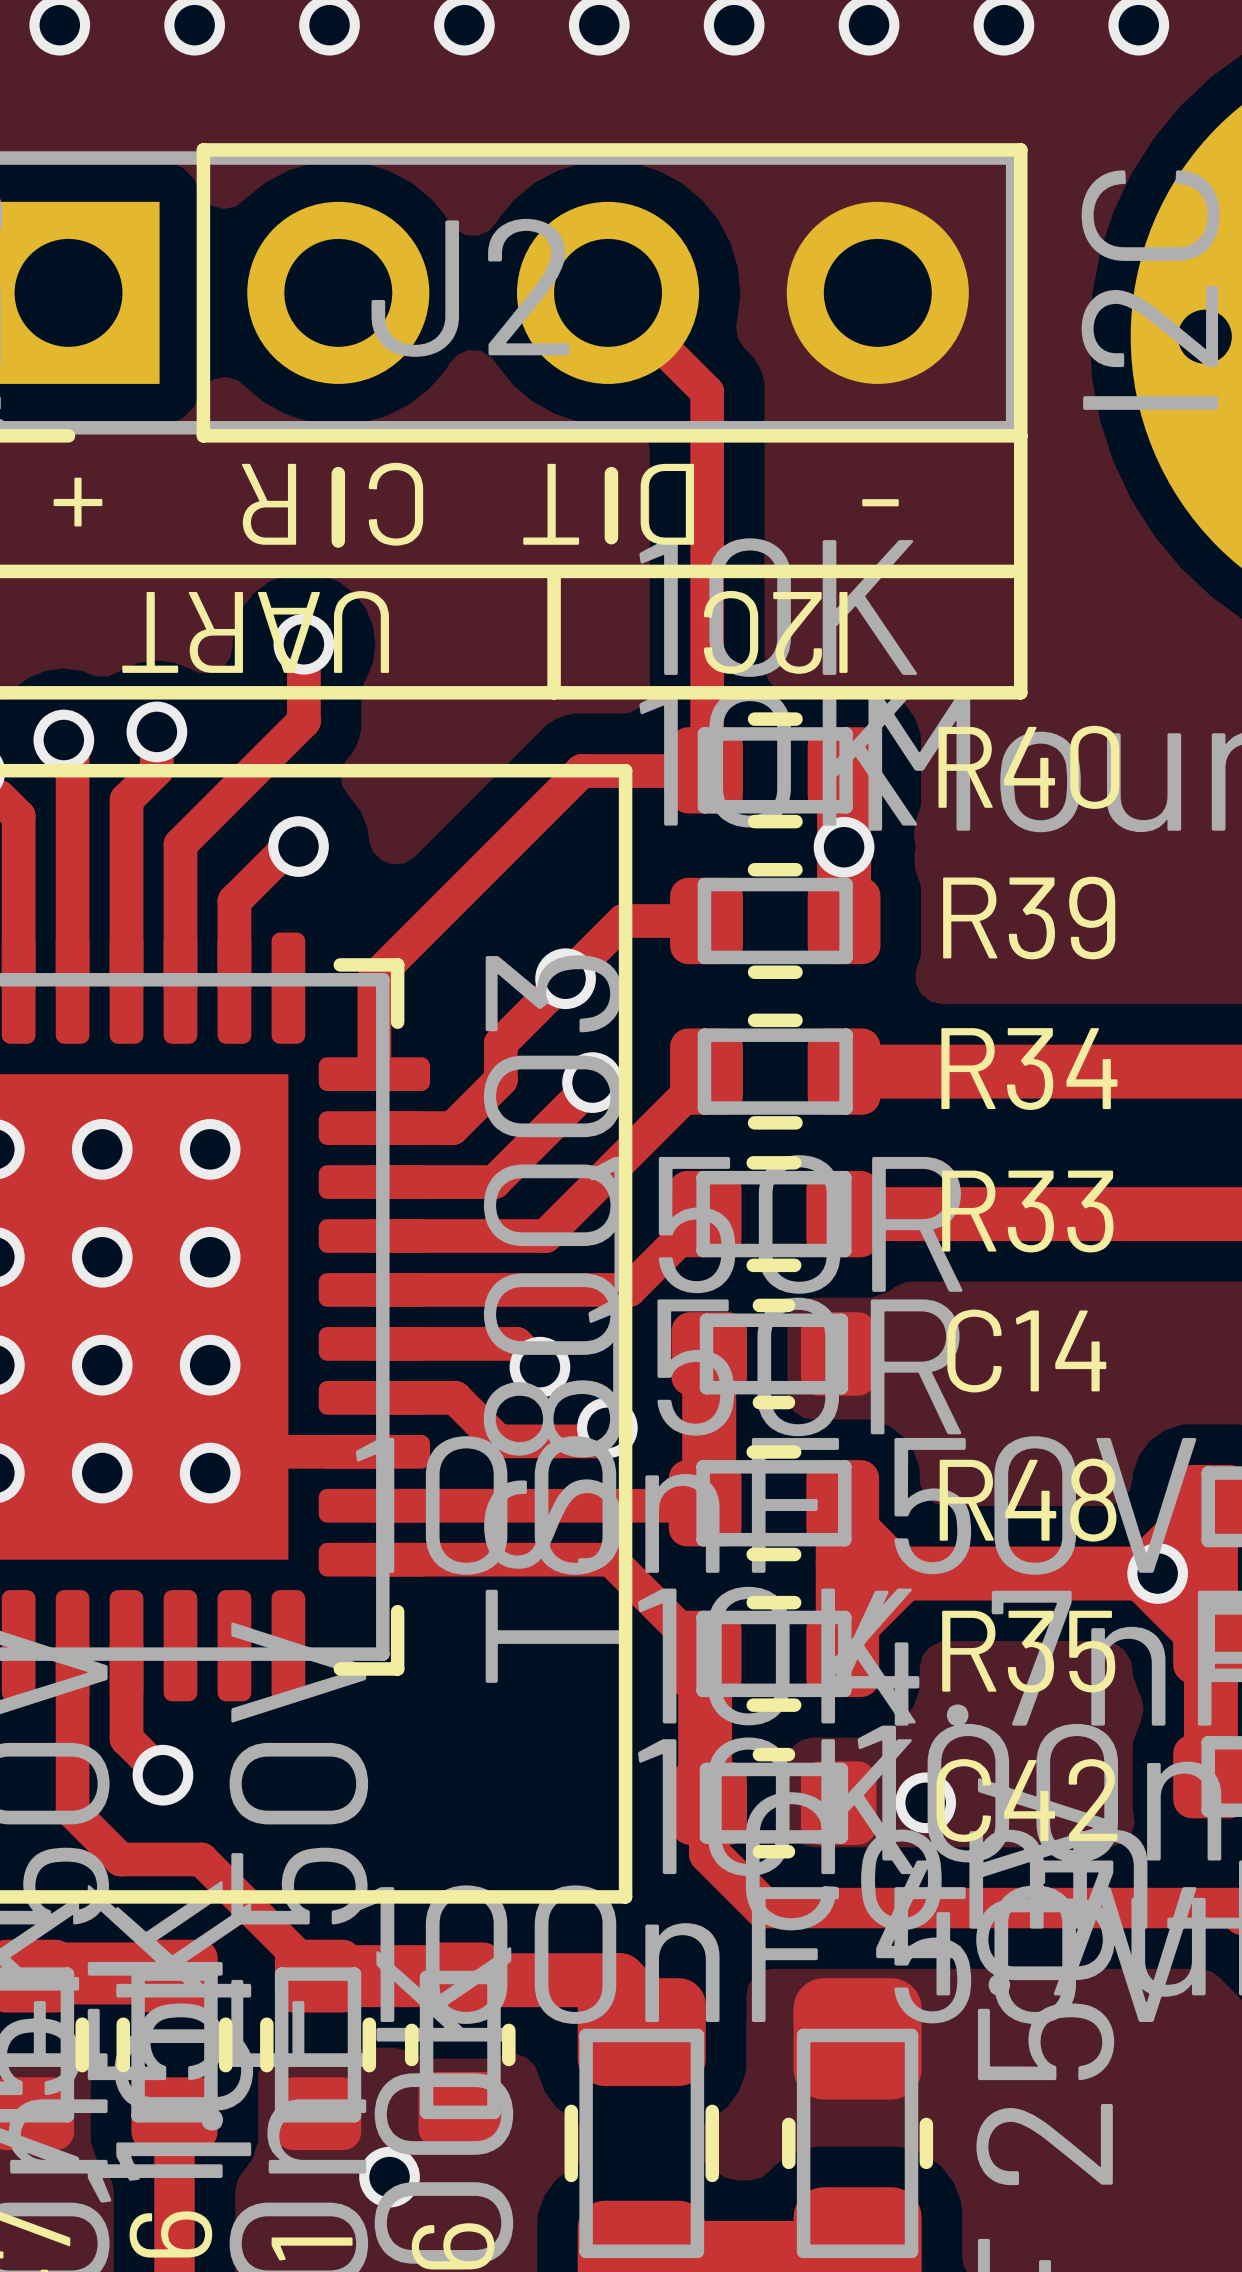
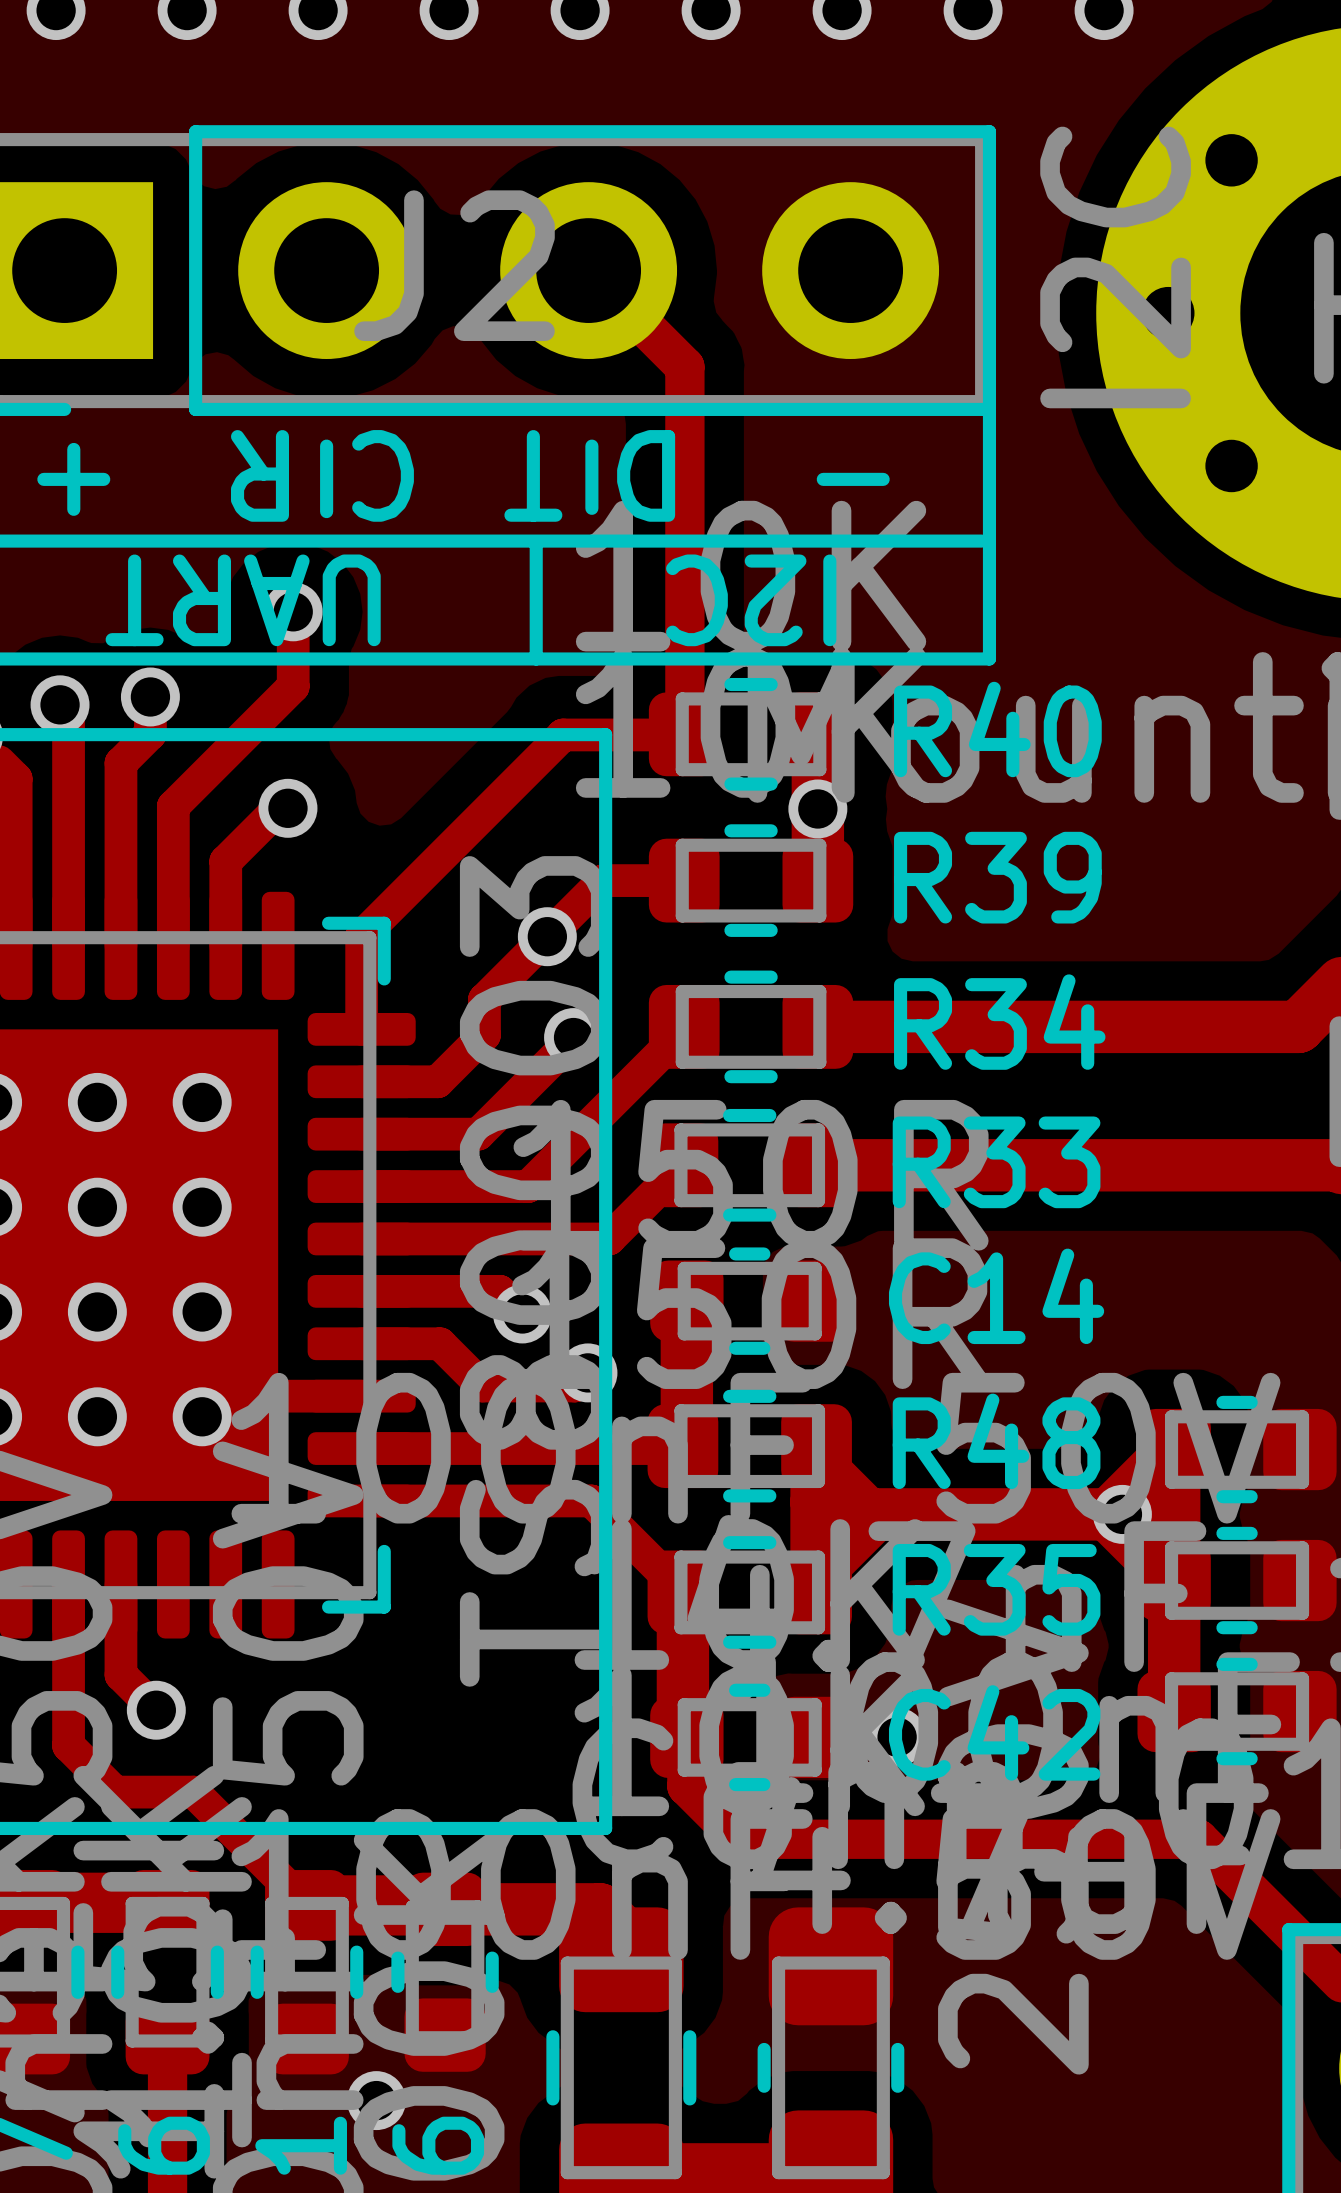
track width: thin (608, 292) (707, 392) (707, 769) -> thick (588, 270) (684, 366) (684, 733)

